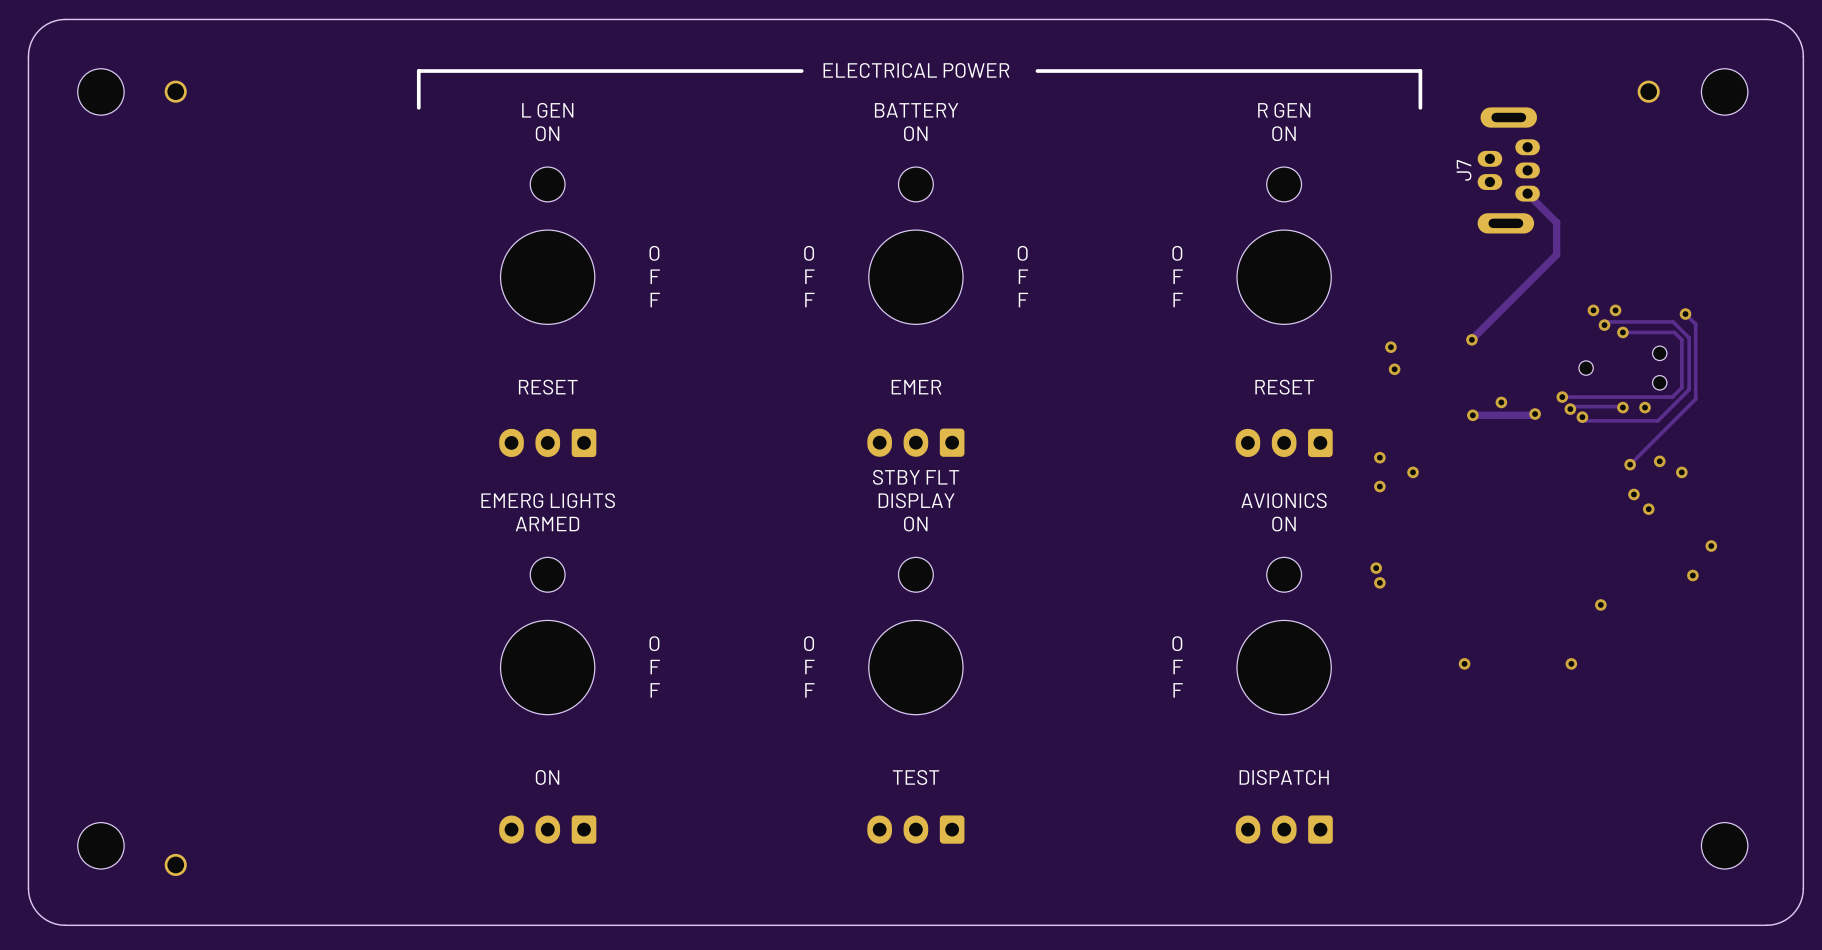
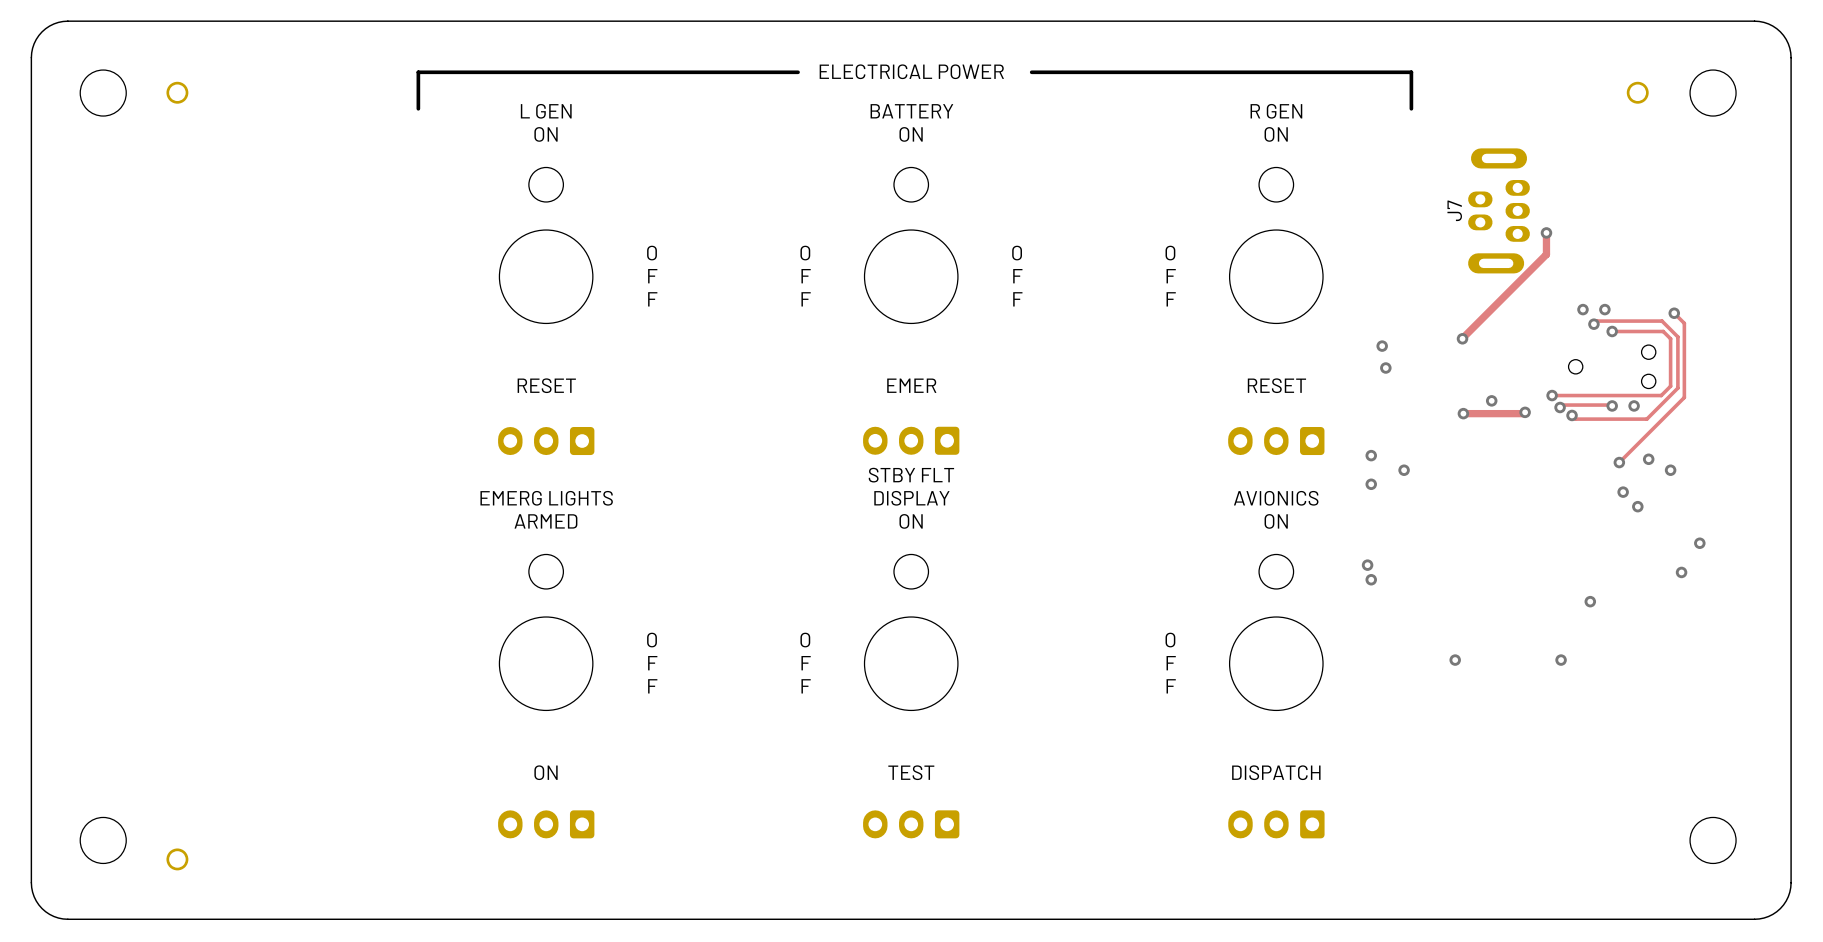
J7 position: (1508, 170) -> (1499, 210)
track: (1527, 193) (1556, 222) (1556, 233) -> none
via: none -> (1546, 232)

